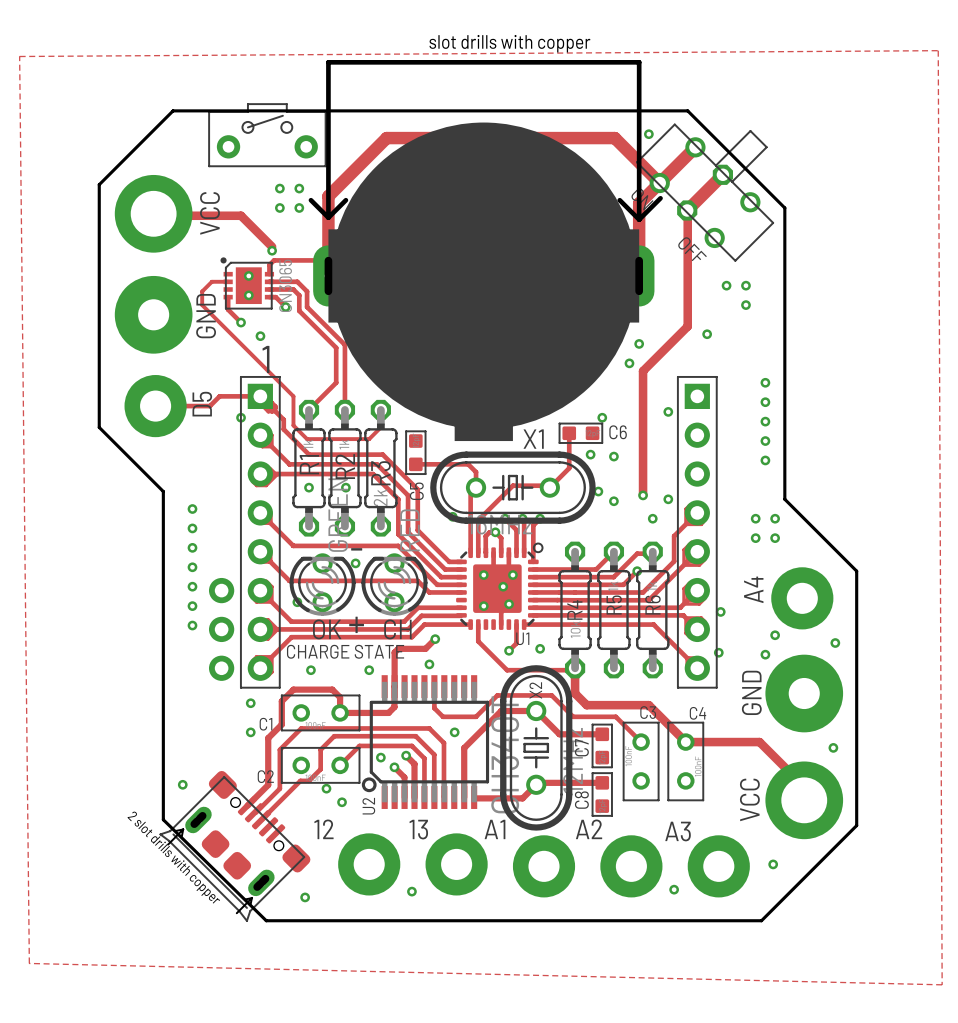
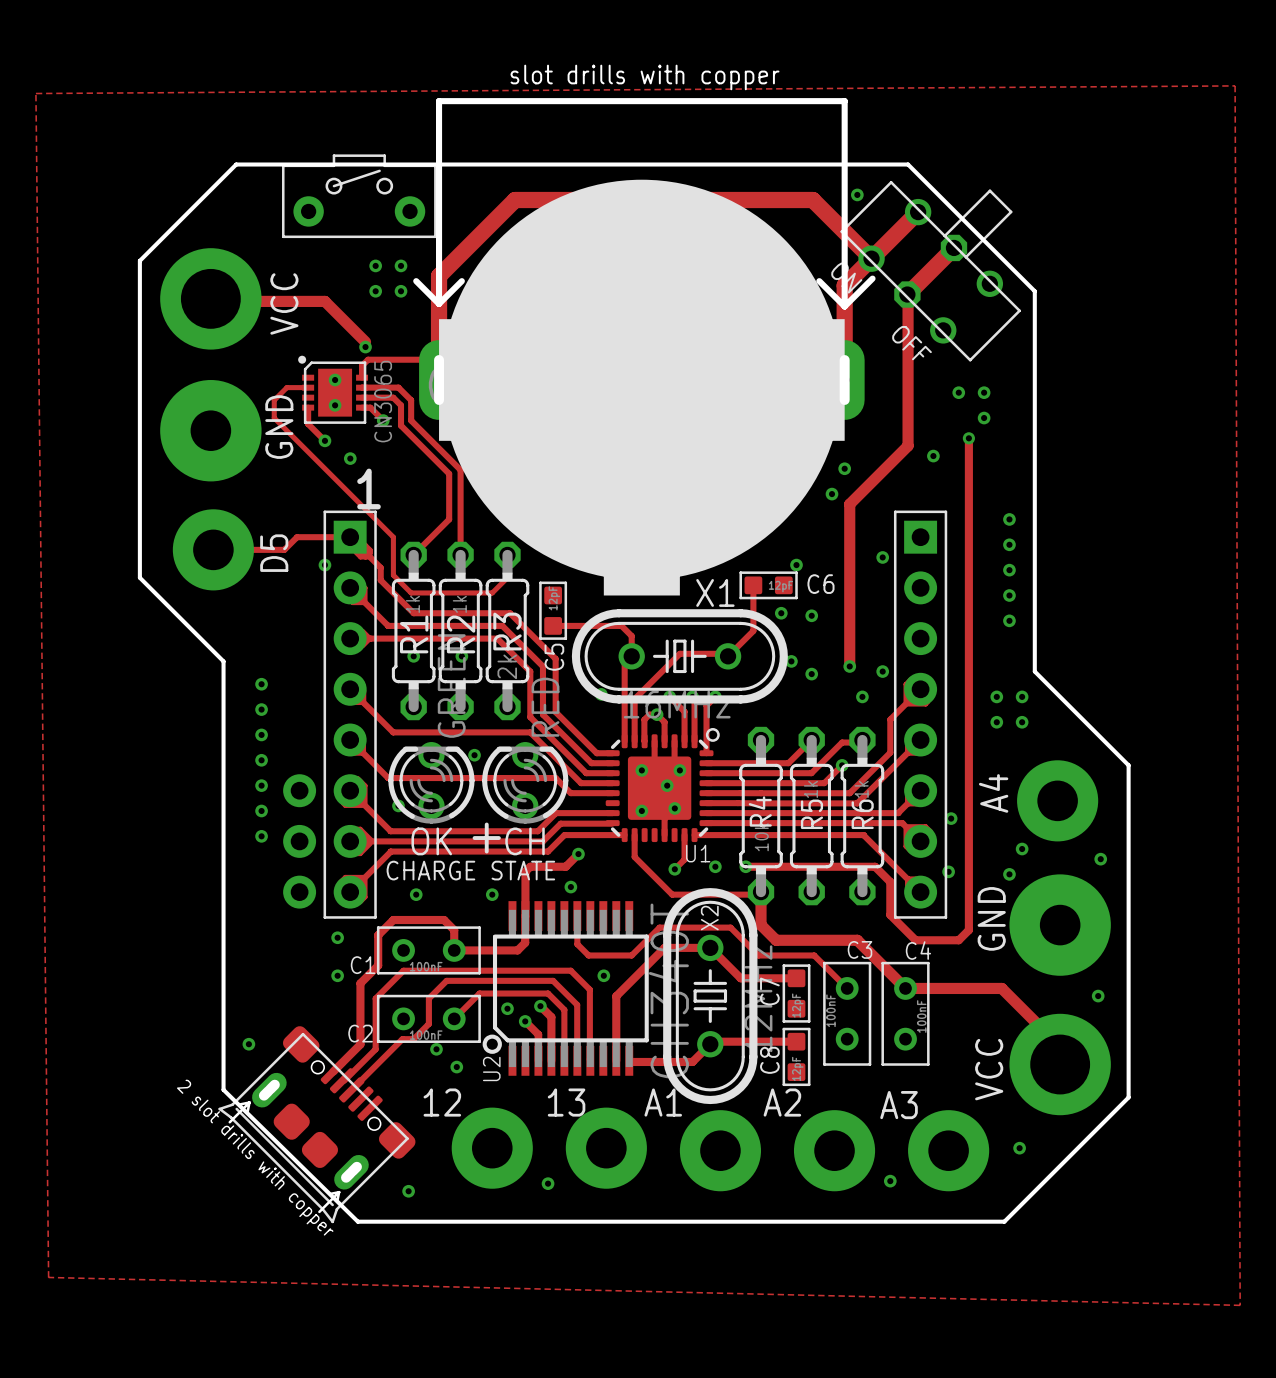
track: none -> (968, 438) (968, 930) (958, 940) (915, 940) (890, 914) (890, 881) (875, 866) (745, 866)
via: none -> (968, 438)
track: (277, 474) (266, 485) (256, 485) (252, 481) -> none
track: (691, 542) (683, 549) (683, 565) (699, 565) (705, 559) -> none
text: - (356, 549) -> none
track: (689, 582) (683, 588) (683, 602) -> none
track: (705, 598) (699, 604) (683, 604) -> none
via: none -> (745, 866)

